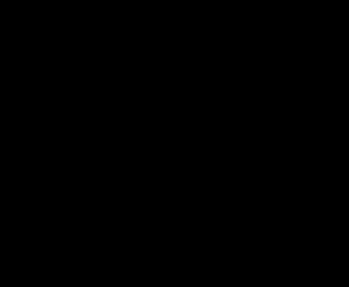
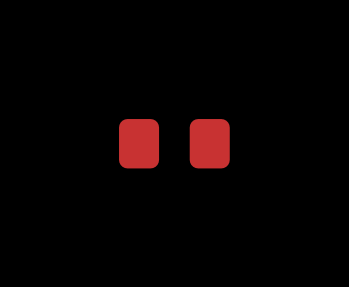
part: none -> (174, 143)

